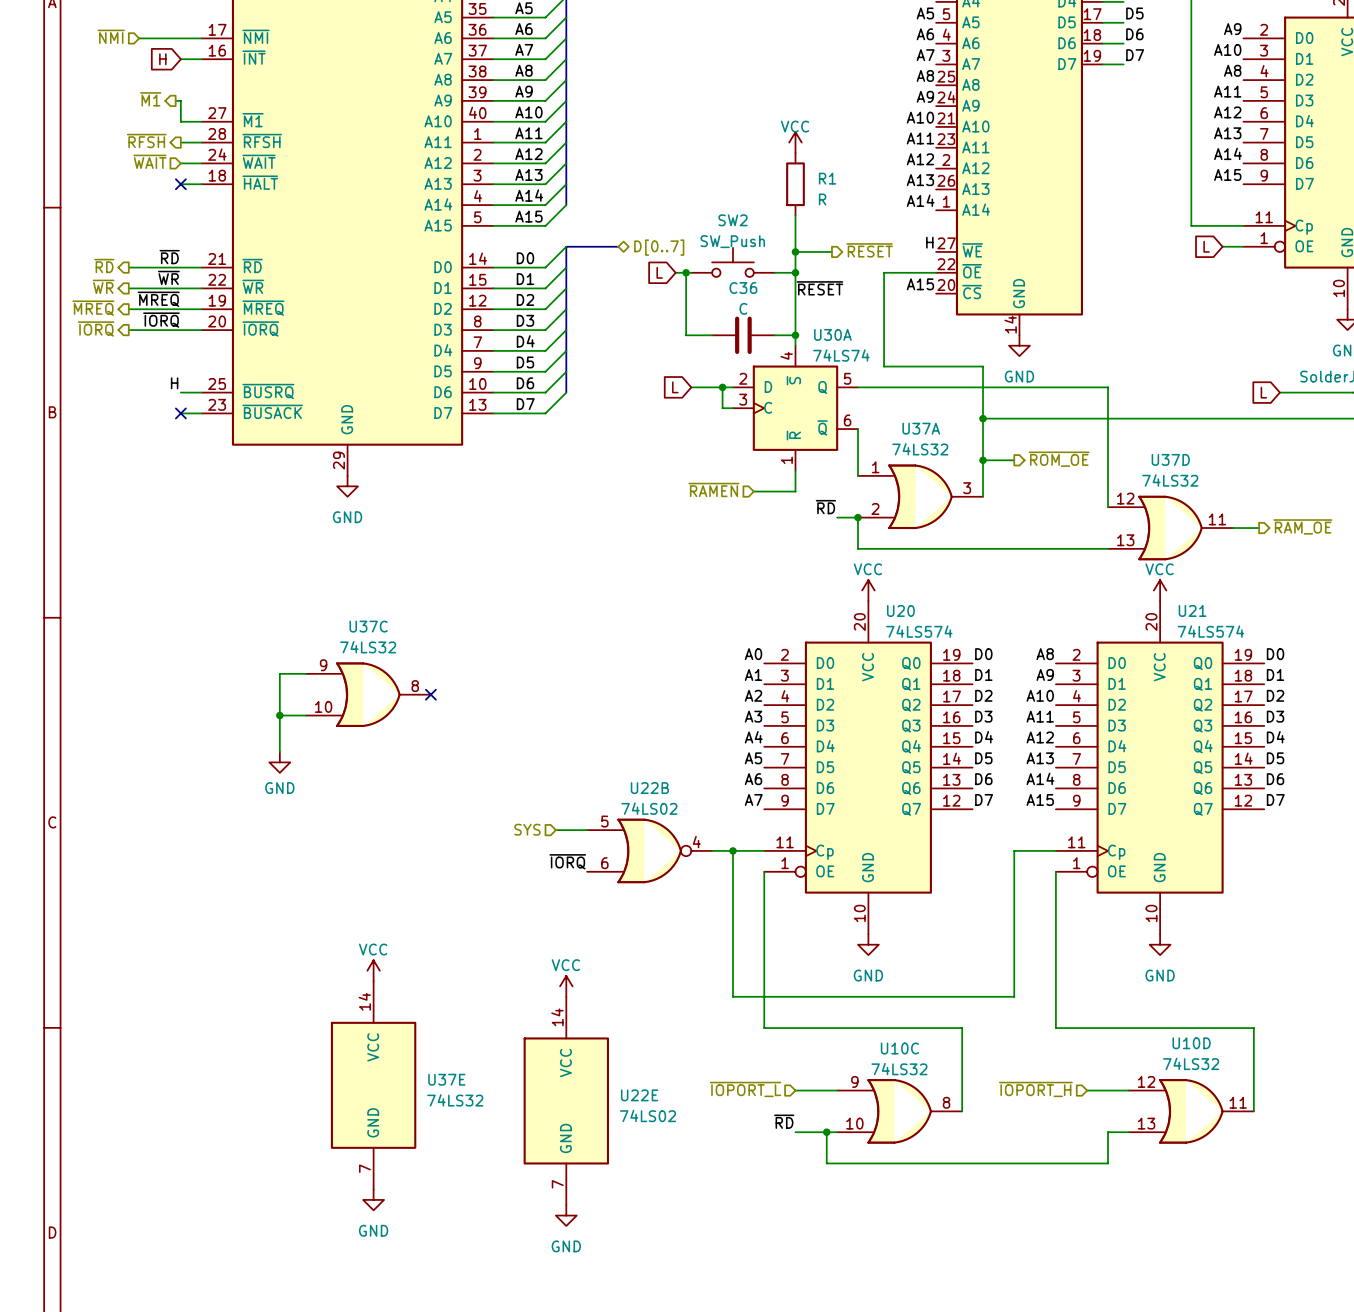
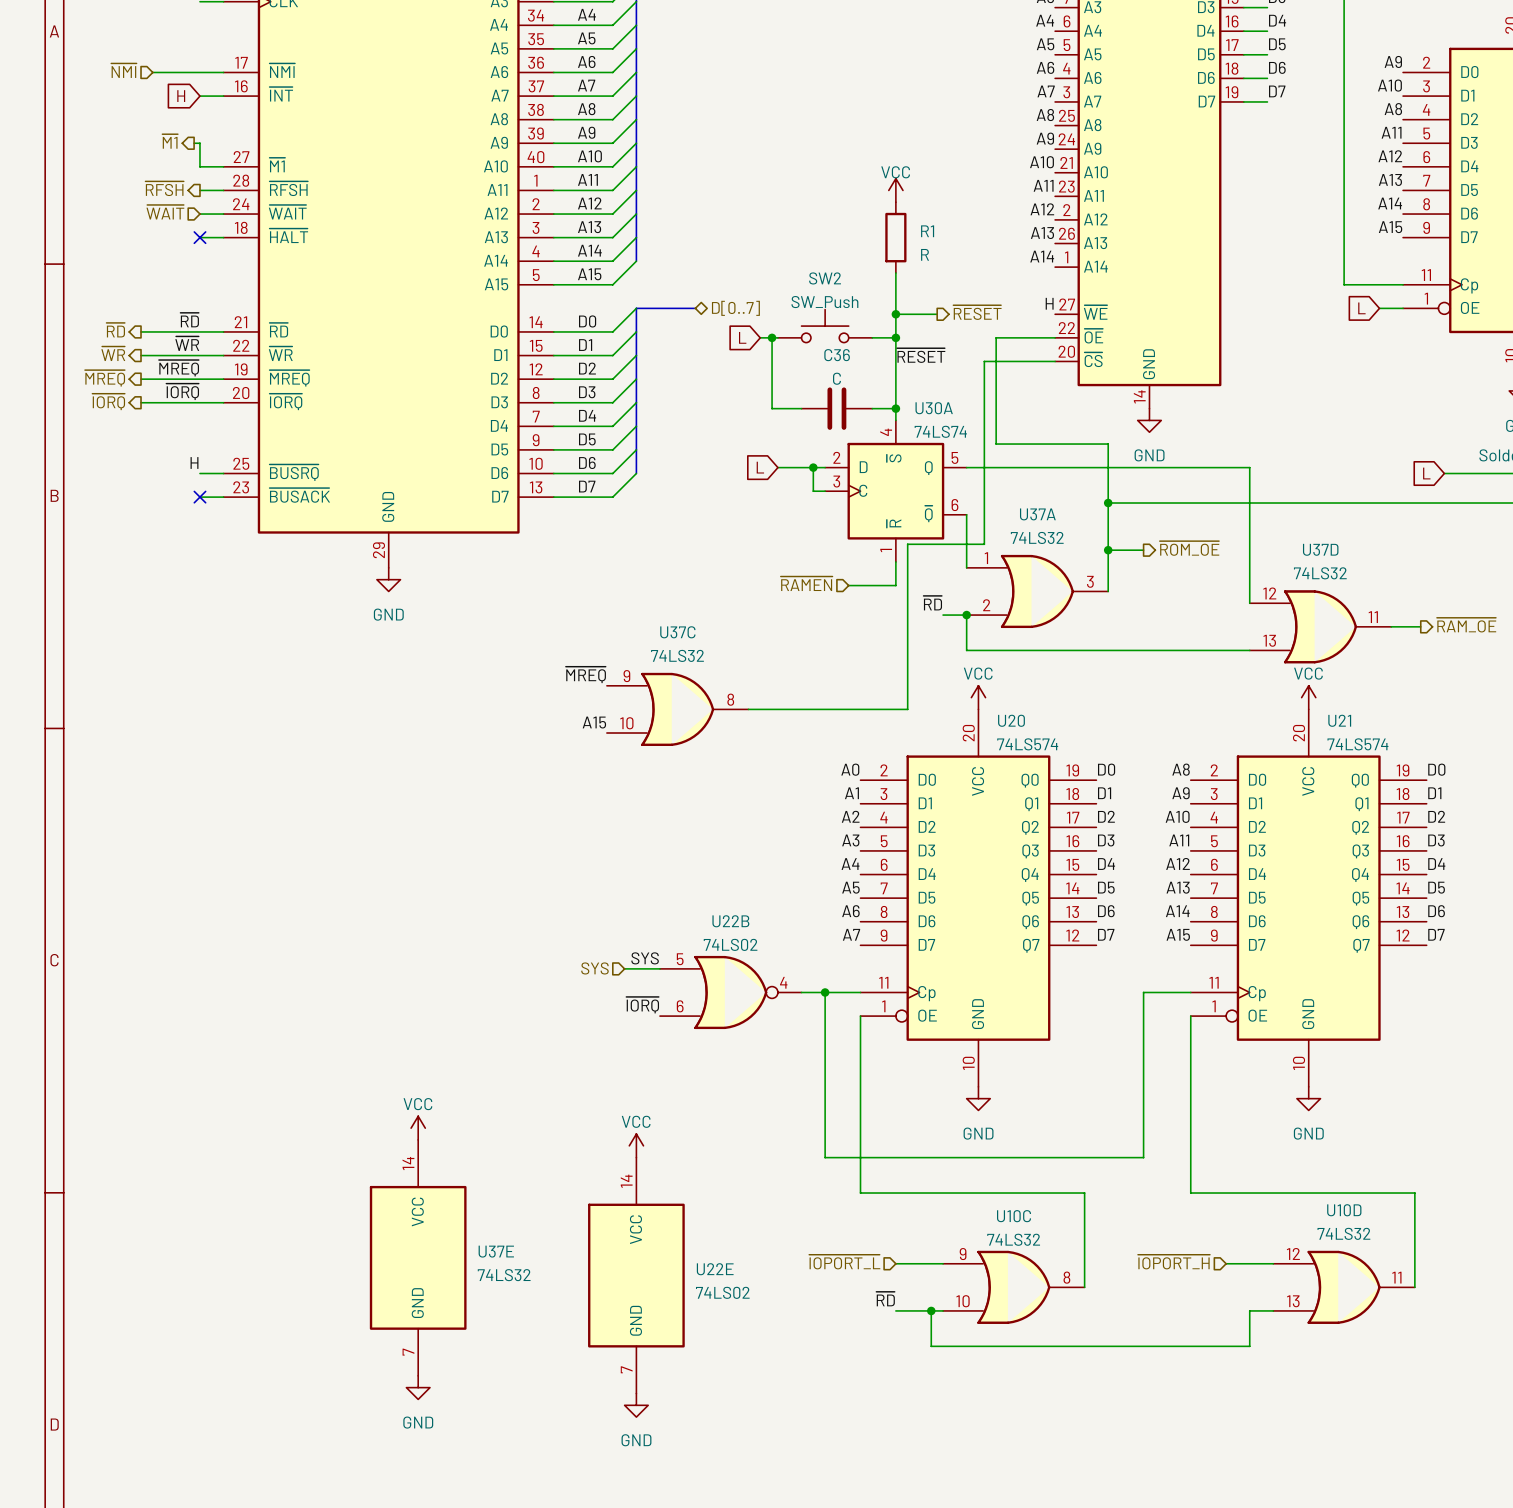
label: A15 (920, 284) -> none
wire: none -> (1055, 361) (984, 361) (984, 544) (907, 544) (907, 709) (748, 709)
label: none -> ~{MREQ} (585, 674)
label: none -> A15 (594, 722)
wire: (305, 673) (279, 673) (279, 751) -> none
U37C position: (368, 694) -> (677, 709)
no-connect mark: (430, 694) -> none
wire: (279, 715) (305, 715) -> none
junction: (279, 715) -> none
power symbol: GND (279, 762) -> none
label: none -> SYS (645, 958)

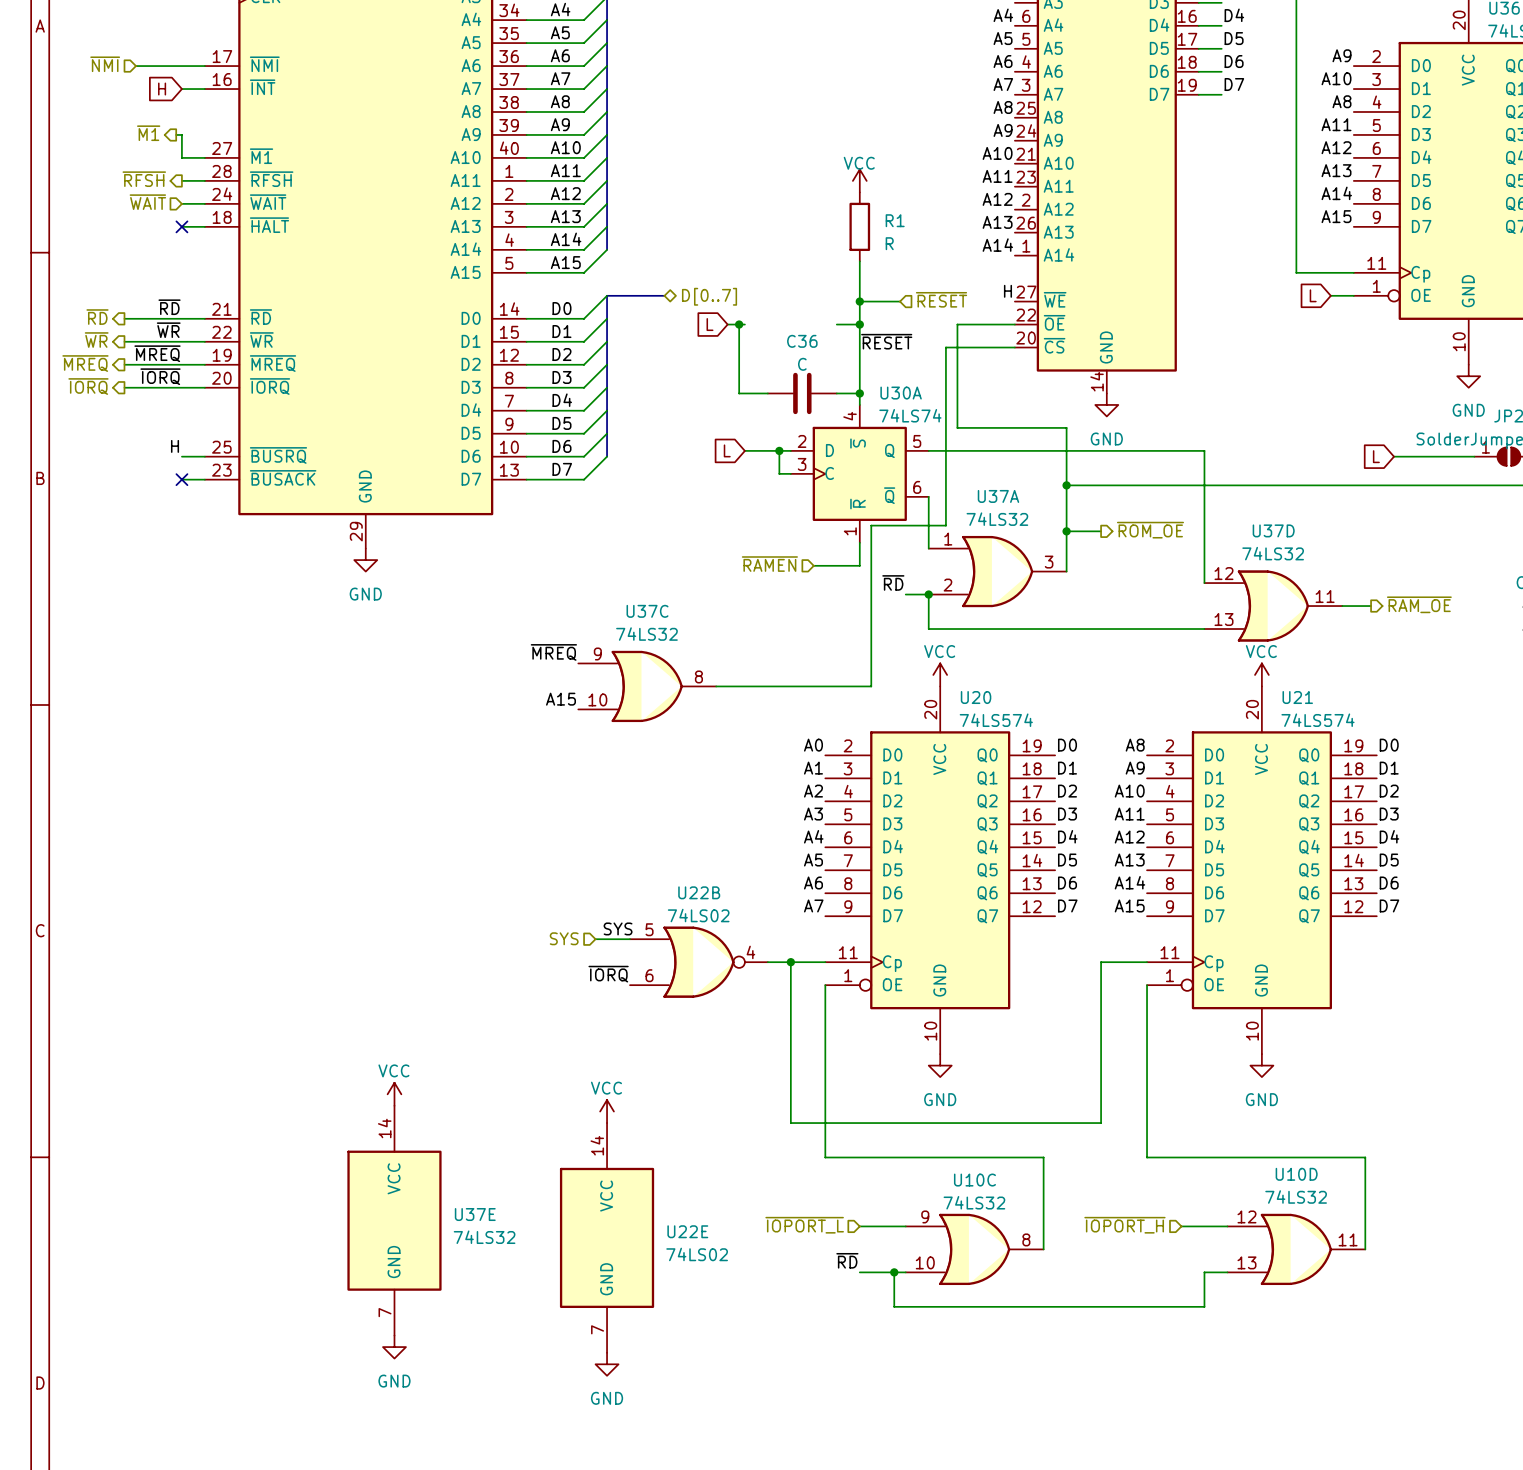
hierarchical label shape: output (977, 312) -> input (941, 299)
SW2: SW_Push (825, 326) -> none

